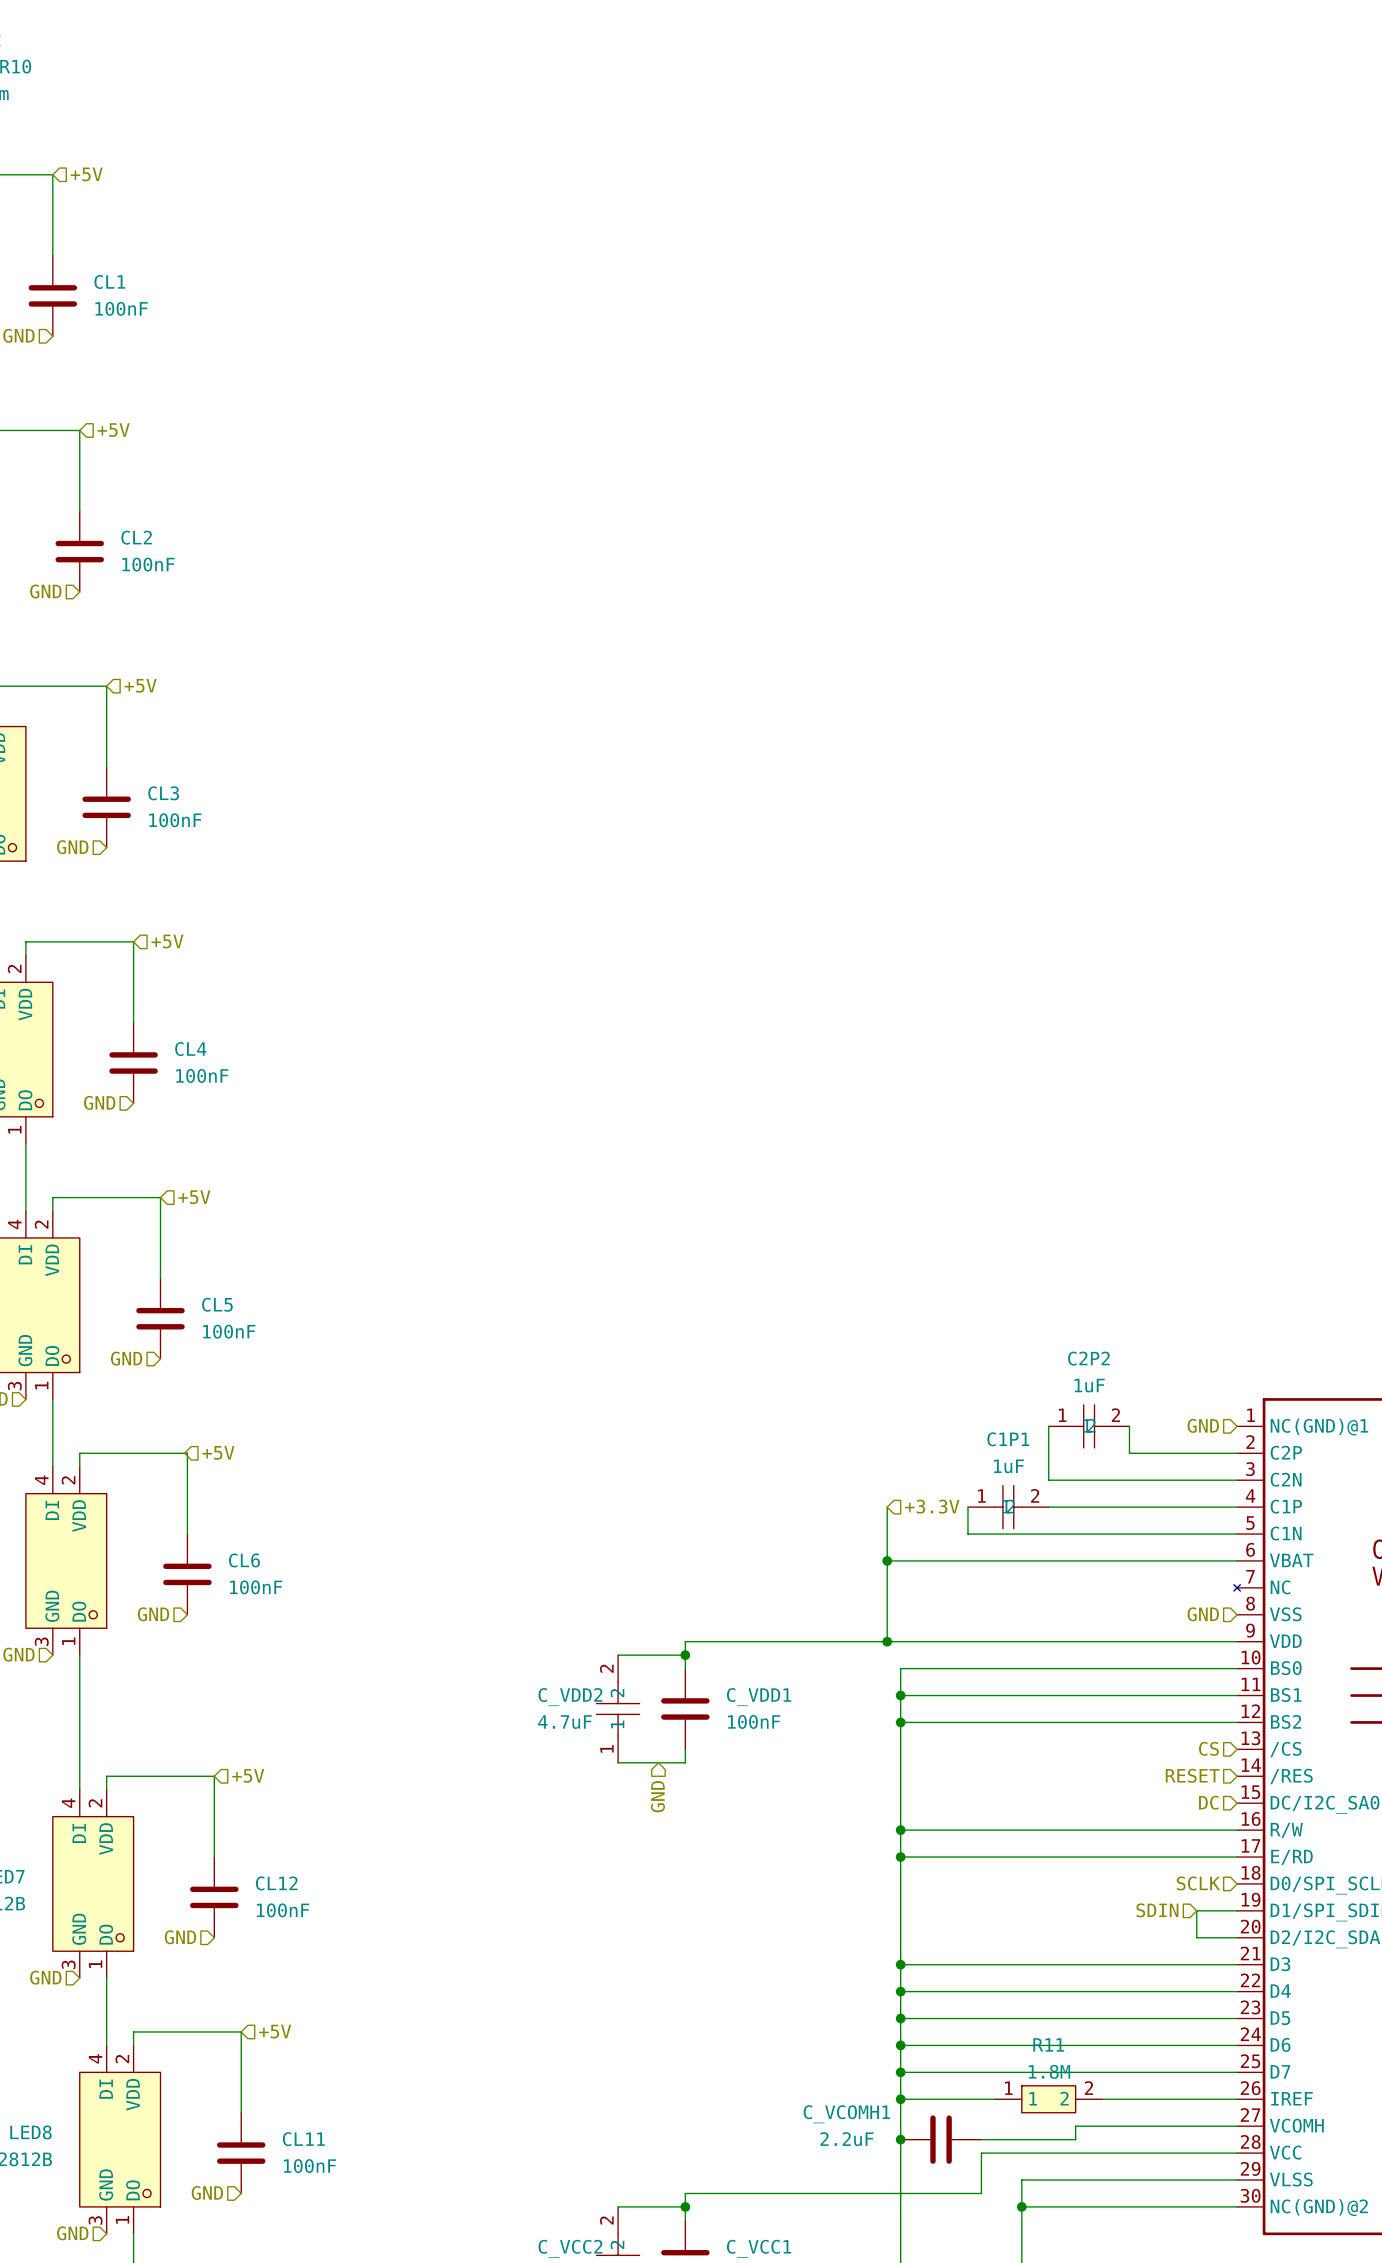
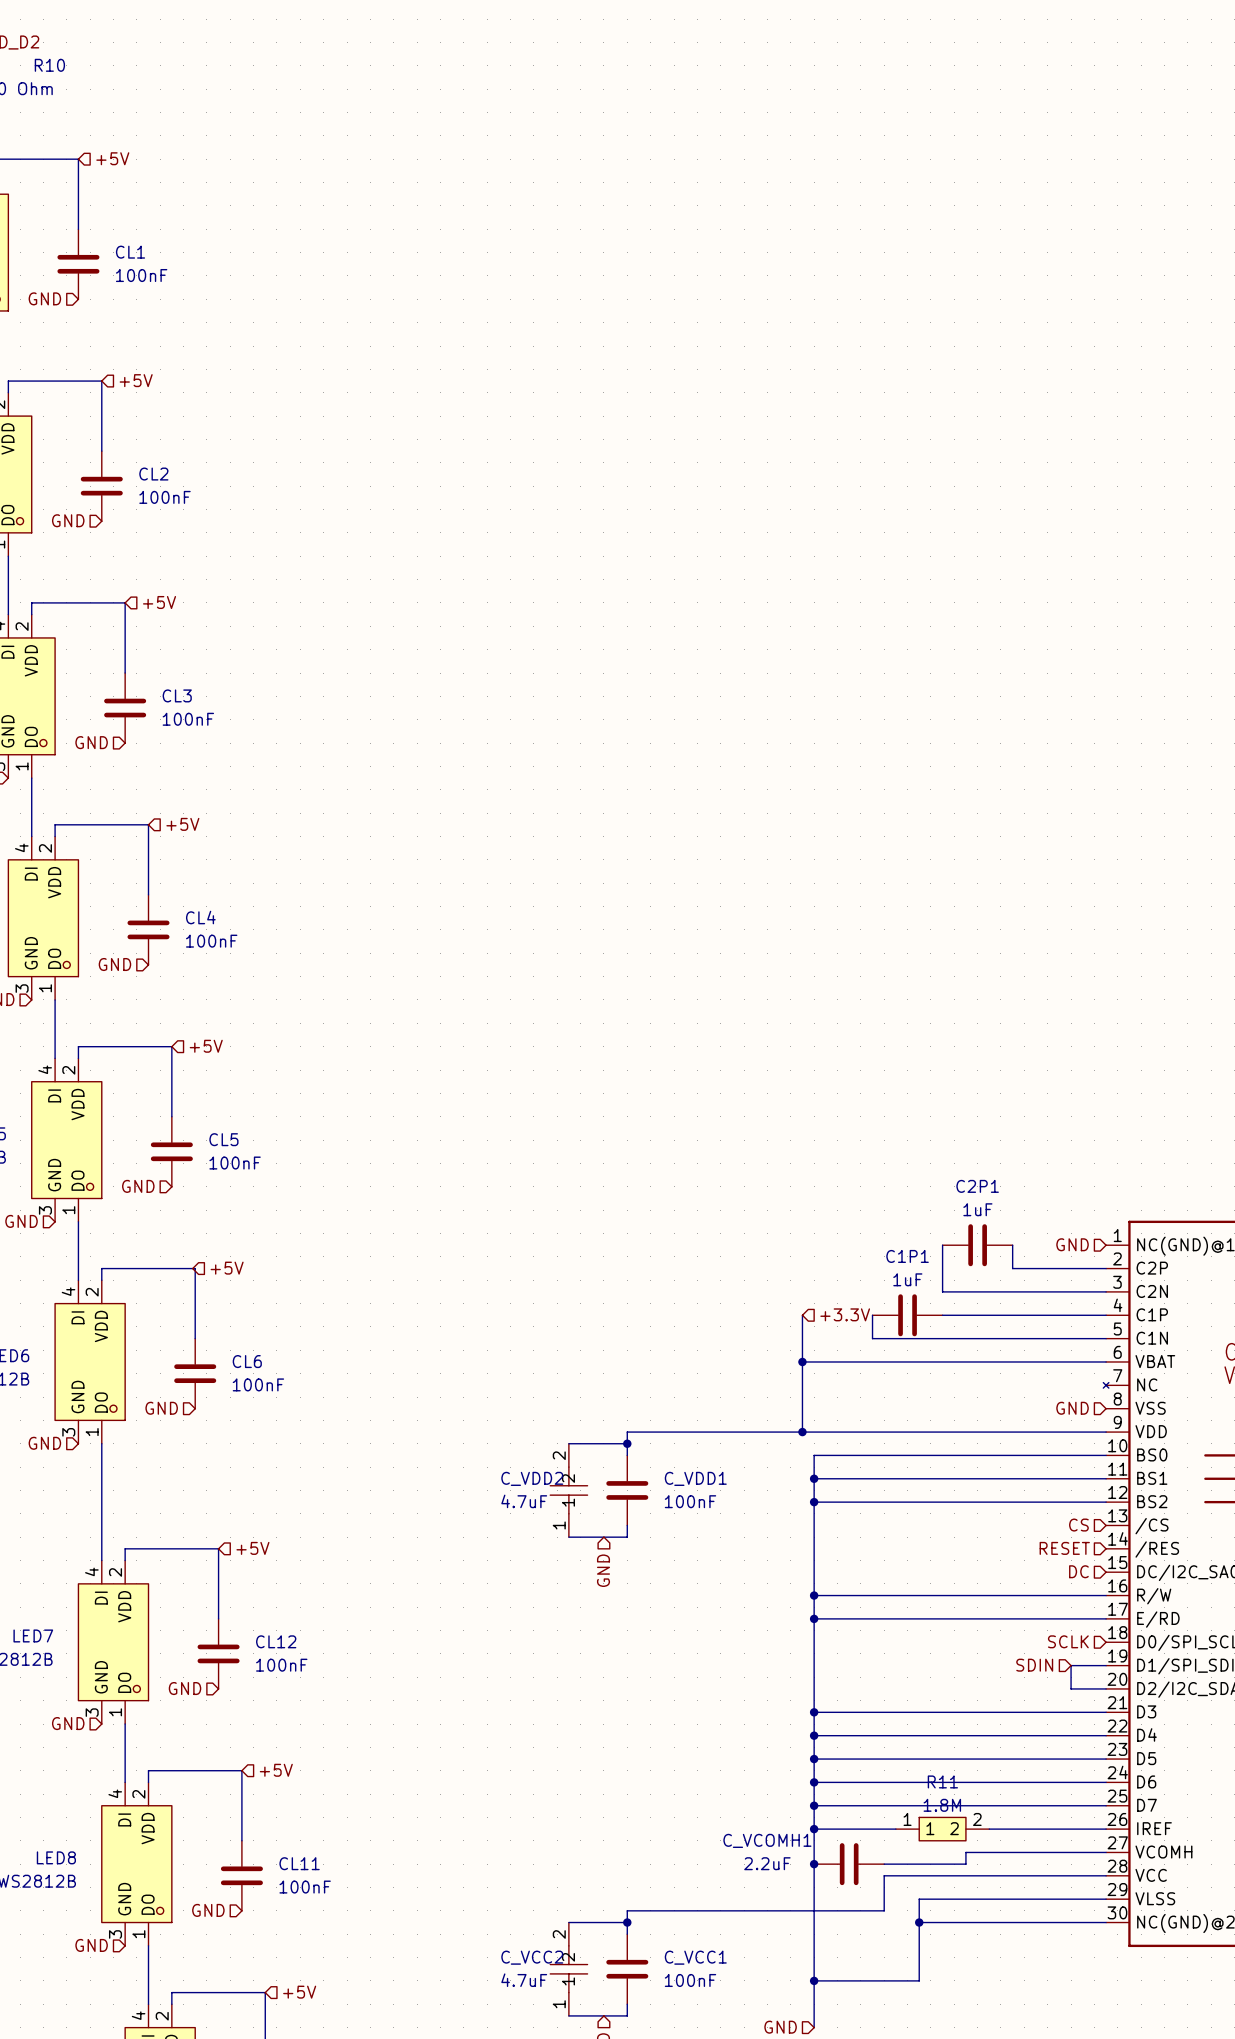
C2P2: 1uF (1089, 1426) -> none
C2P1: none -> 1uF (977, 1245)
C1P1 symbol: [967, 1485, 1049, 1529] -> [872, 1294, 943, 1337]

